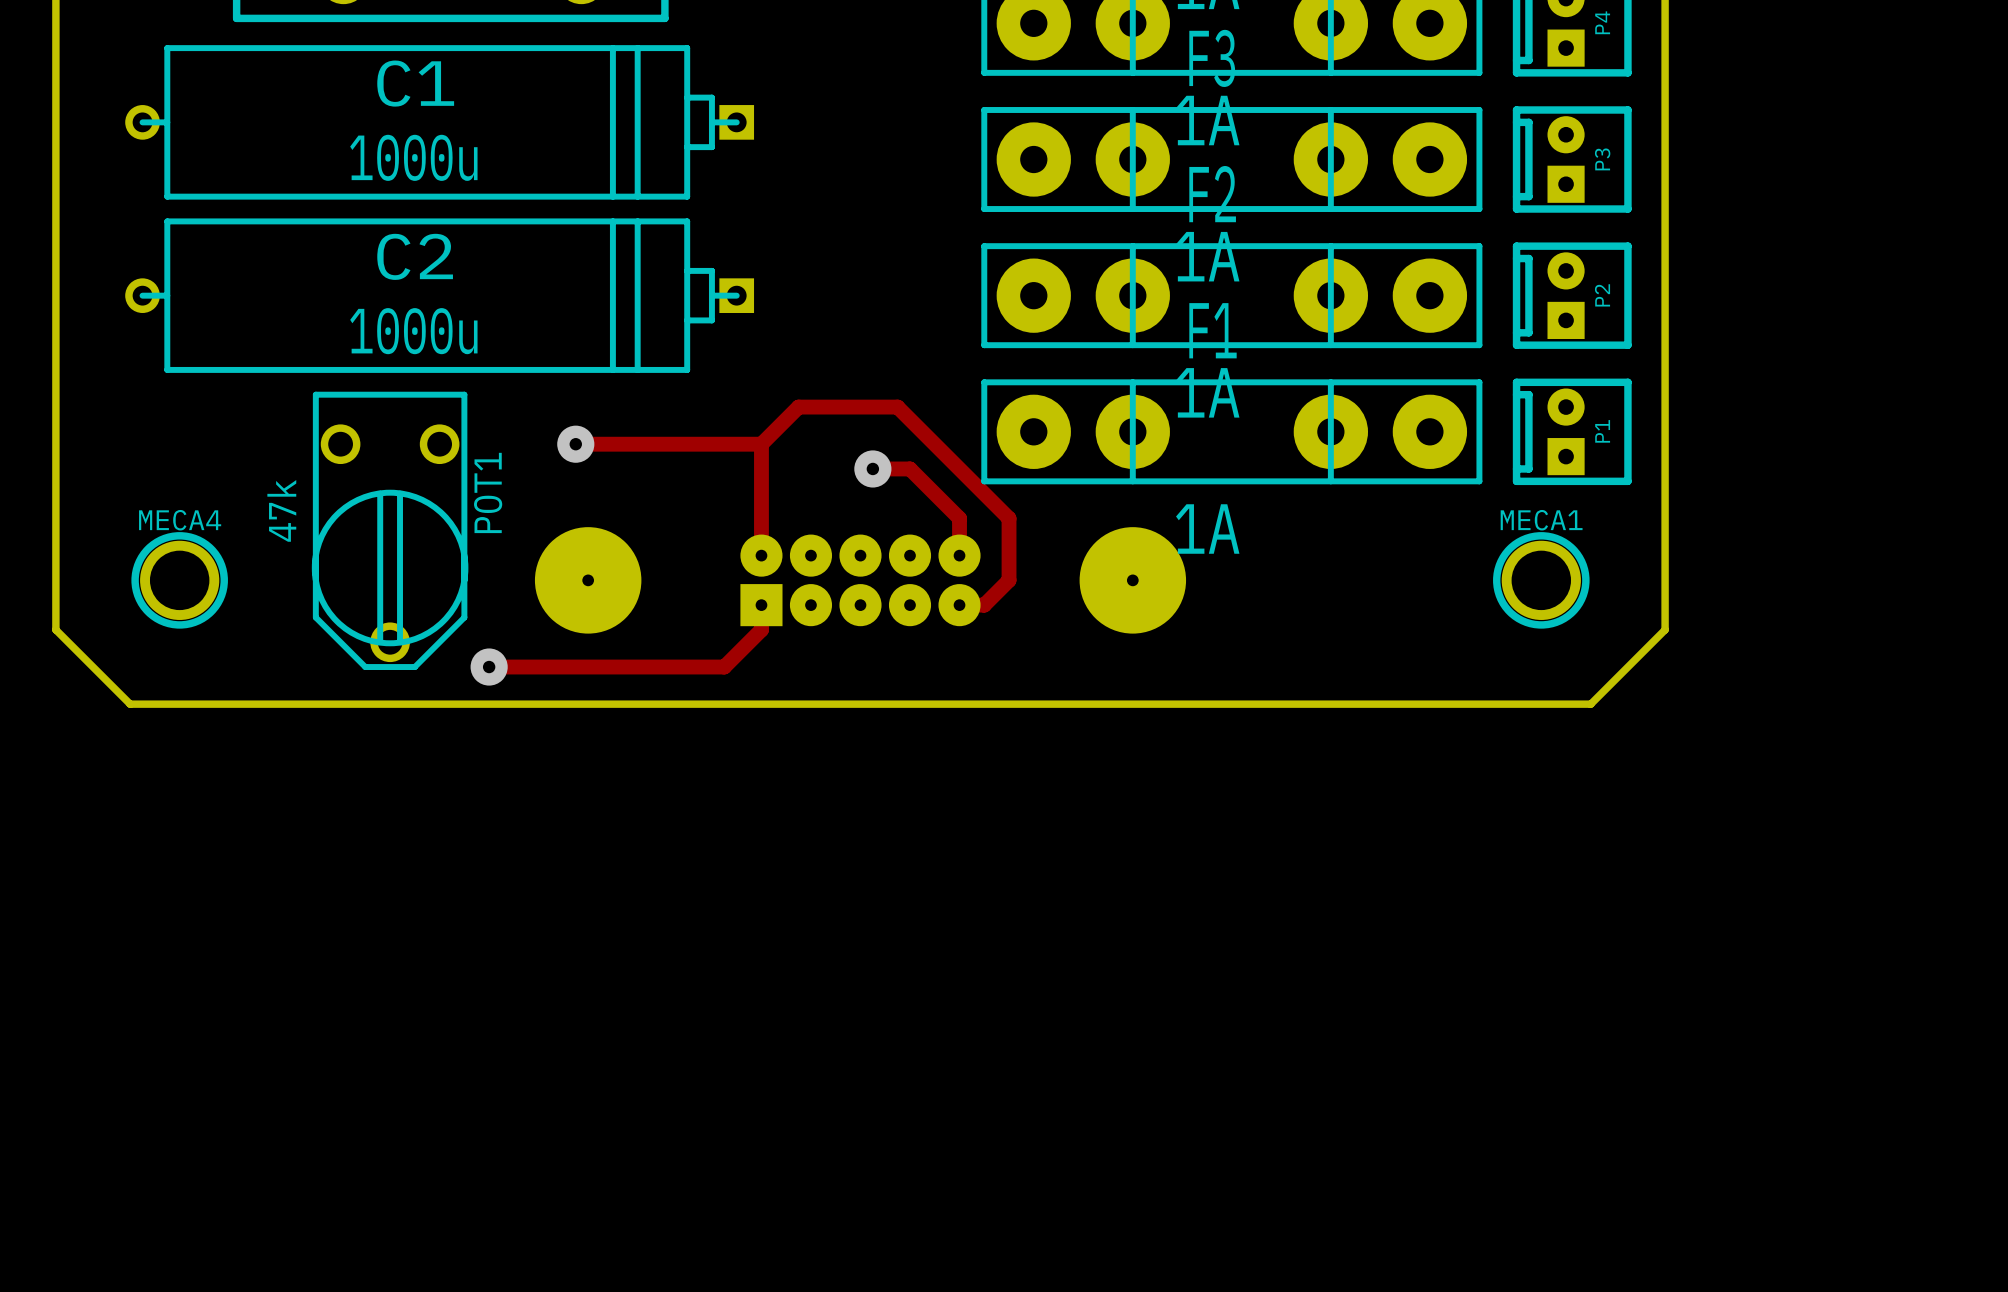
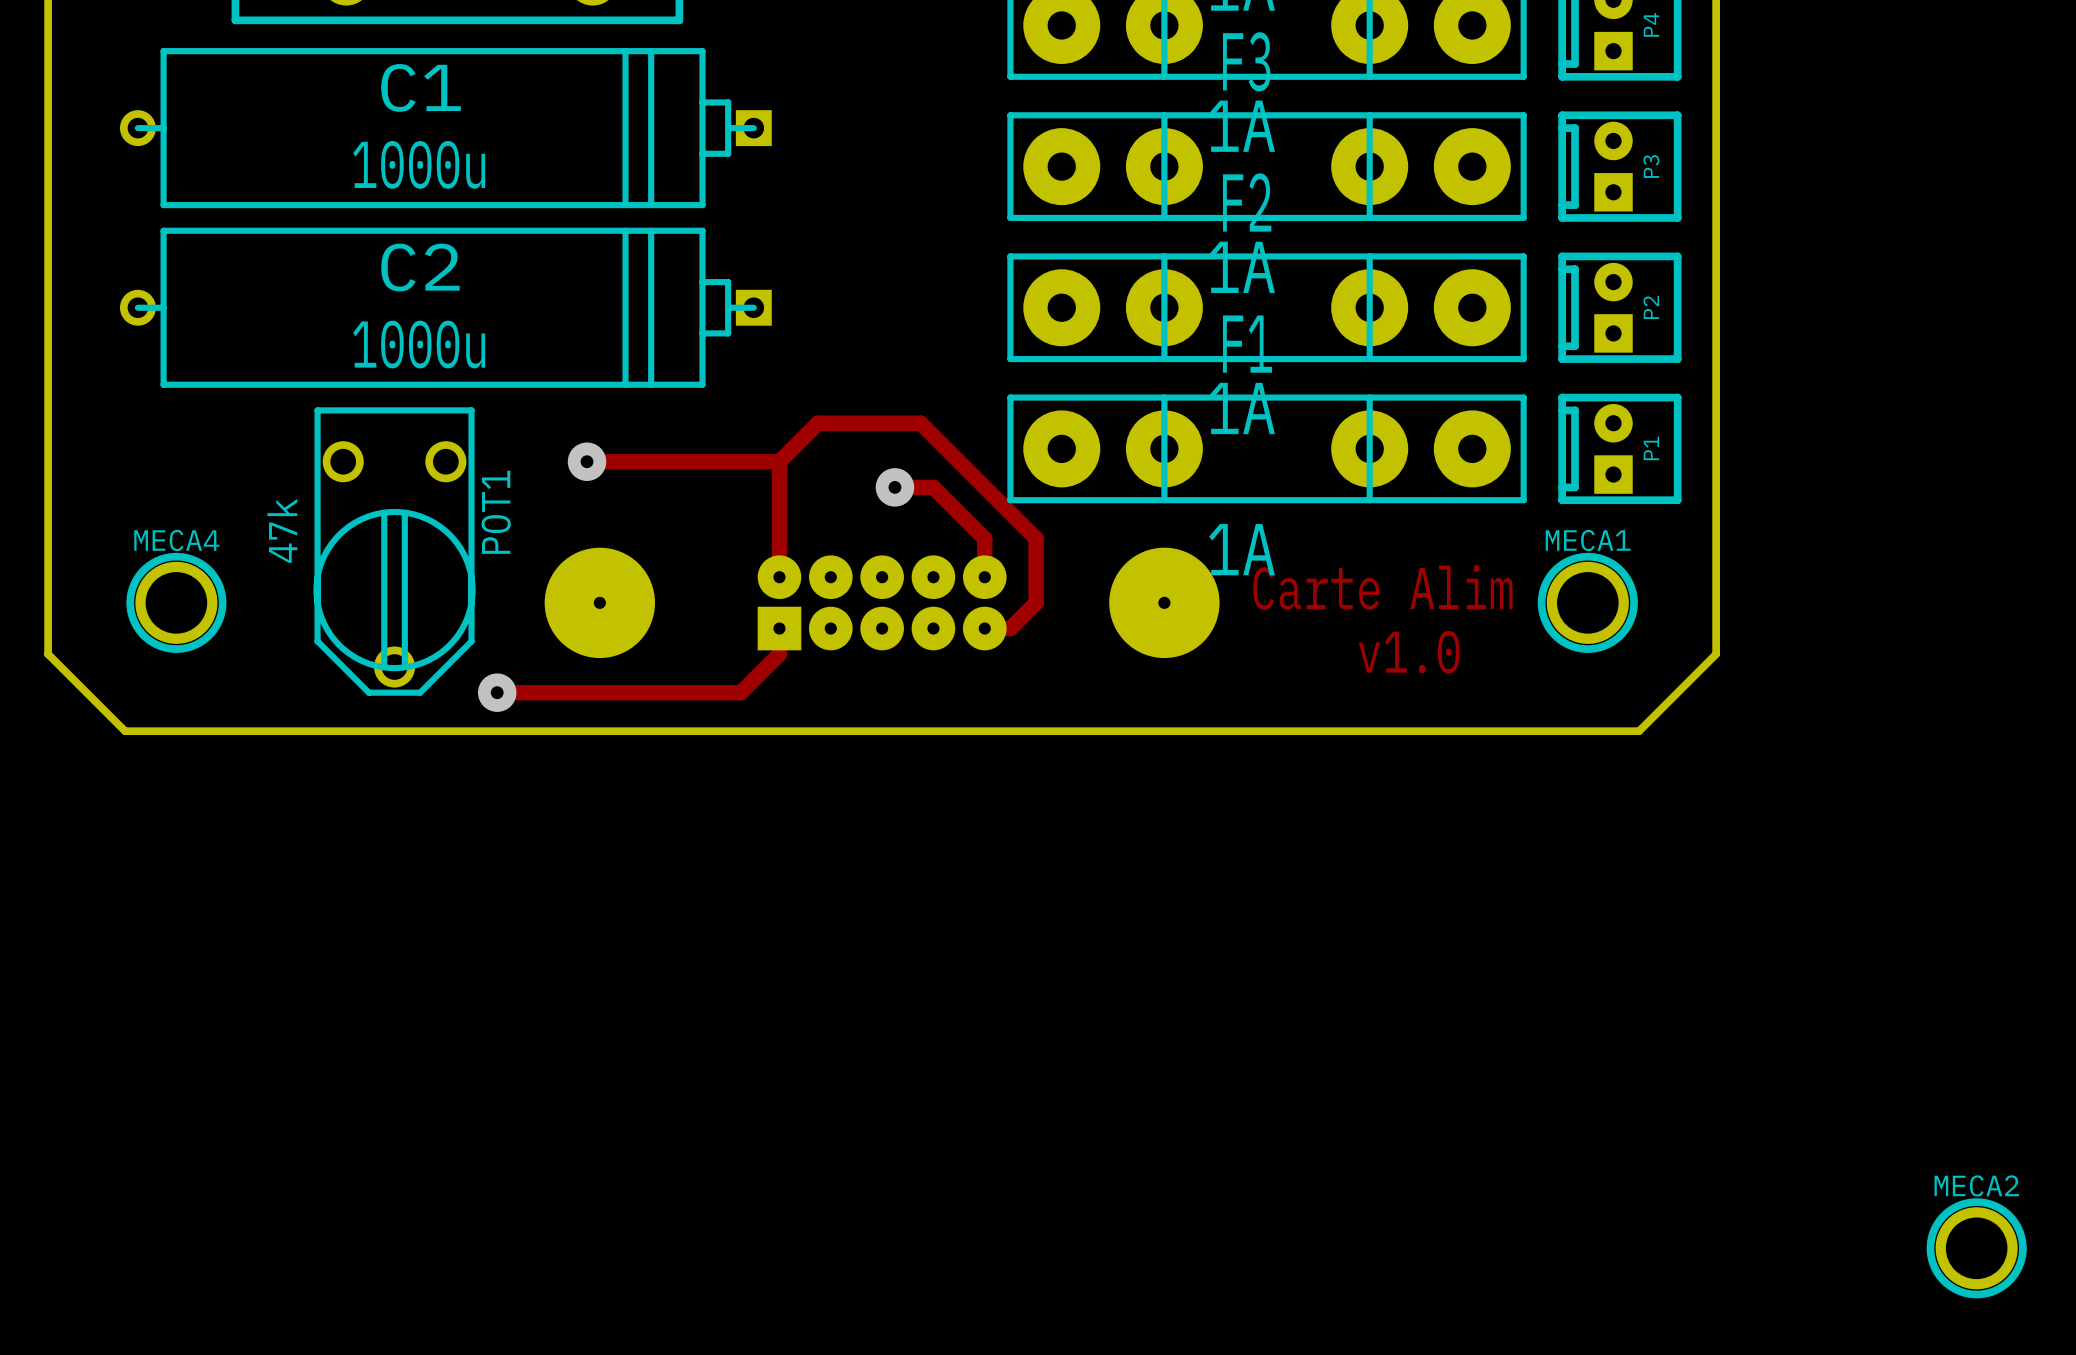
text: none -> Carte Alim (1382, 587)
text: none -> v1.0 (1409, 652)
MECA2: none -> (1976, 1248)

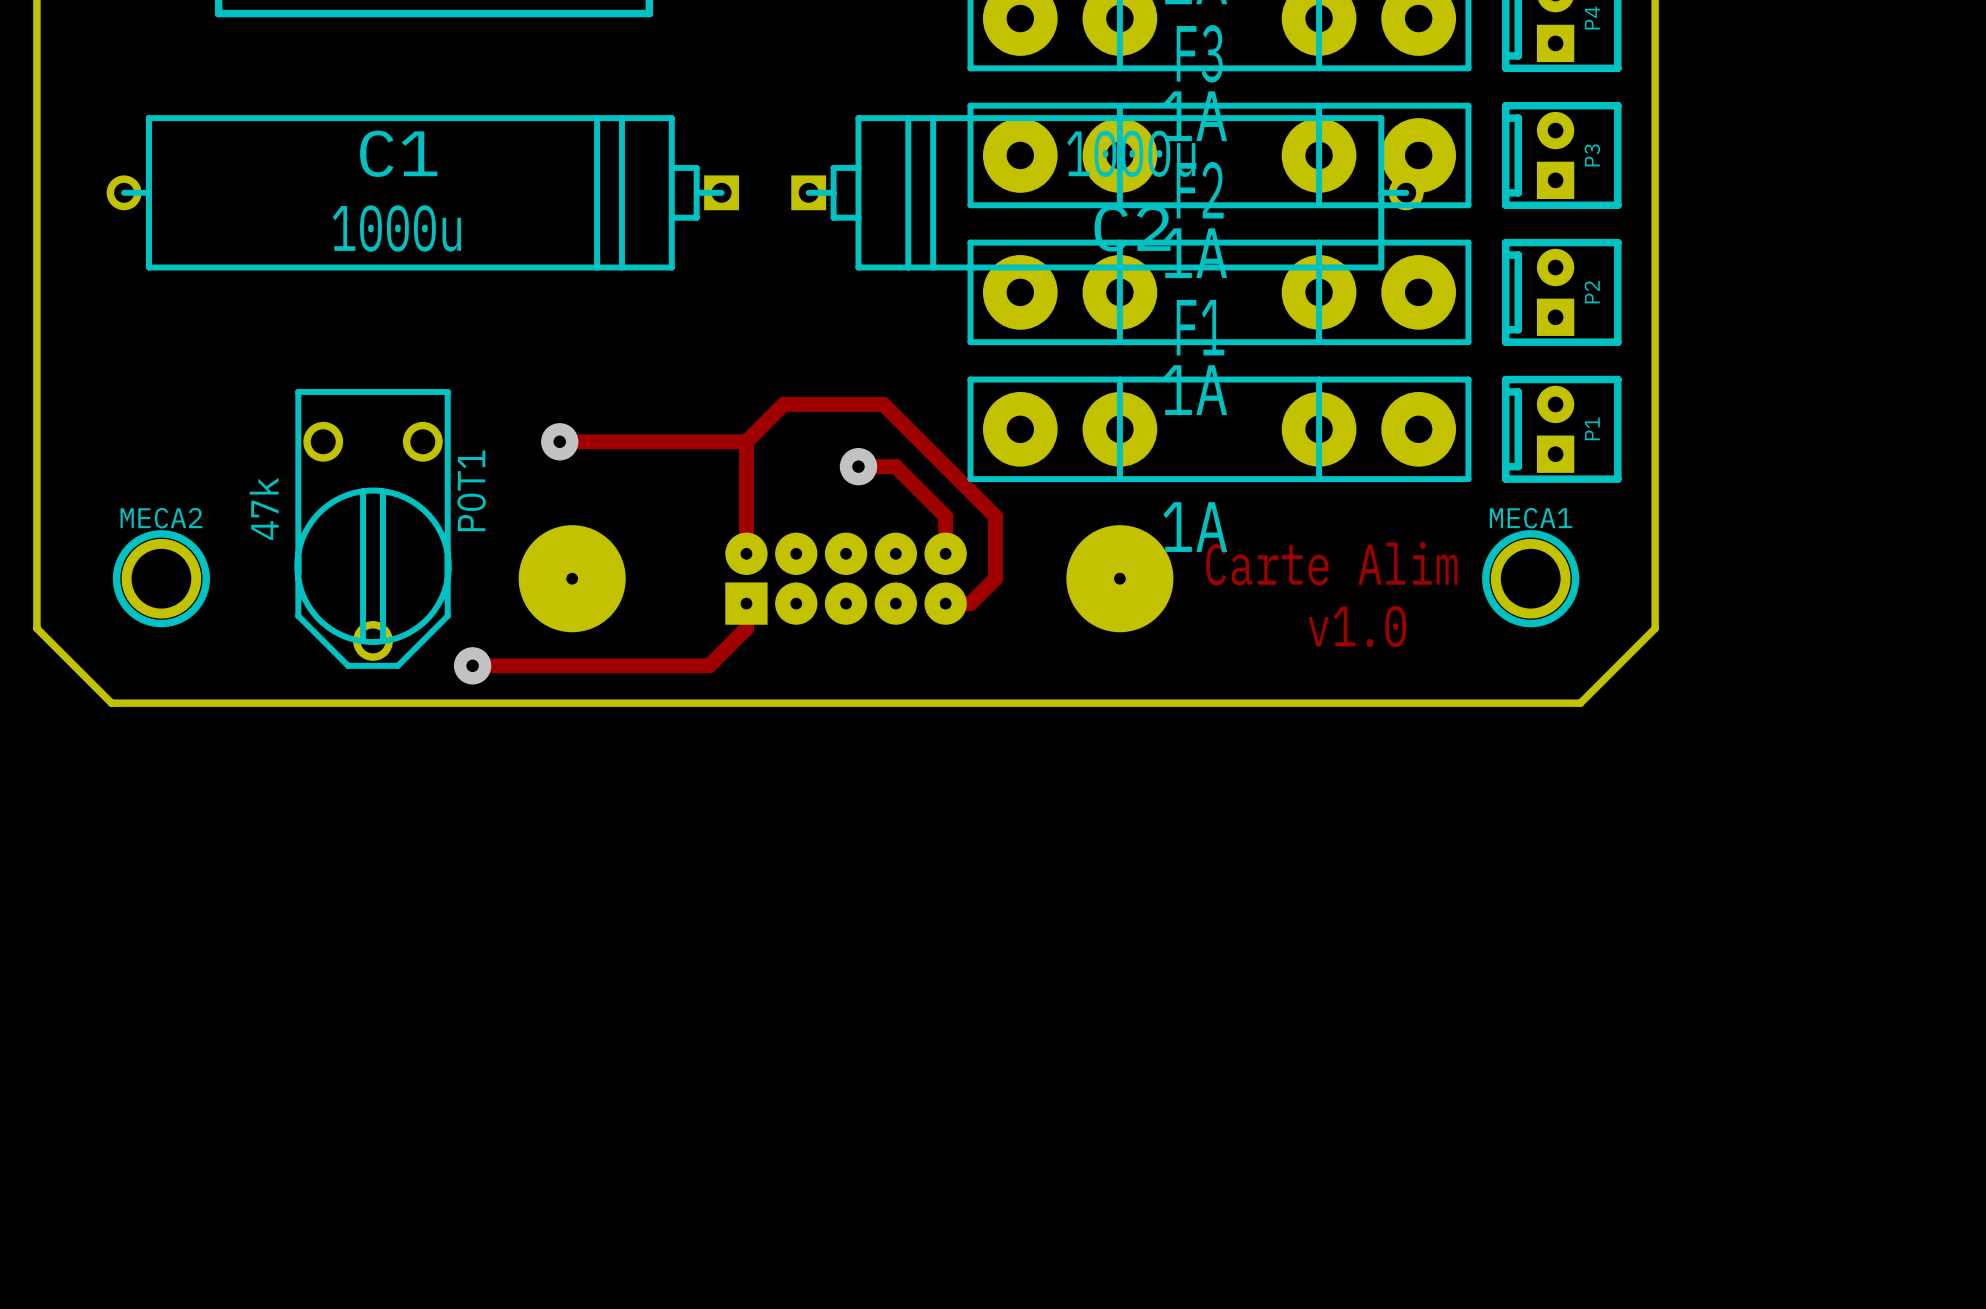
C1 position: (445, 128) -> (422, 192)
C2 rotation: 0° (445, 307) -> 180° (1107, 192)
C2 position: (445, 307) -> (1107, 192)
MECA4 name: MECA4 (176, 540) -> MECA2 (161, 518)
MECA2: (1976, 1248) -> none

